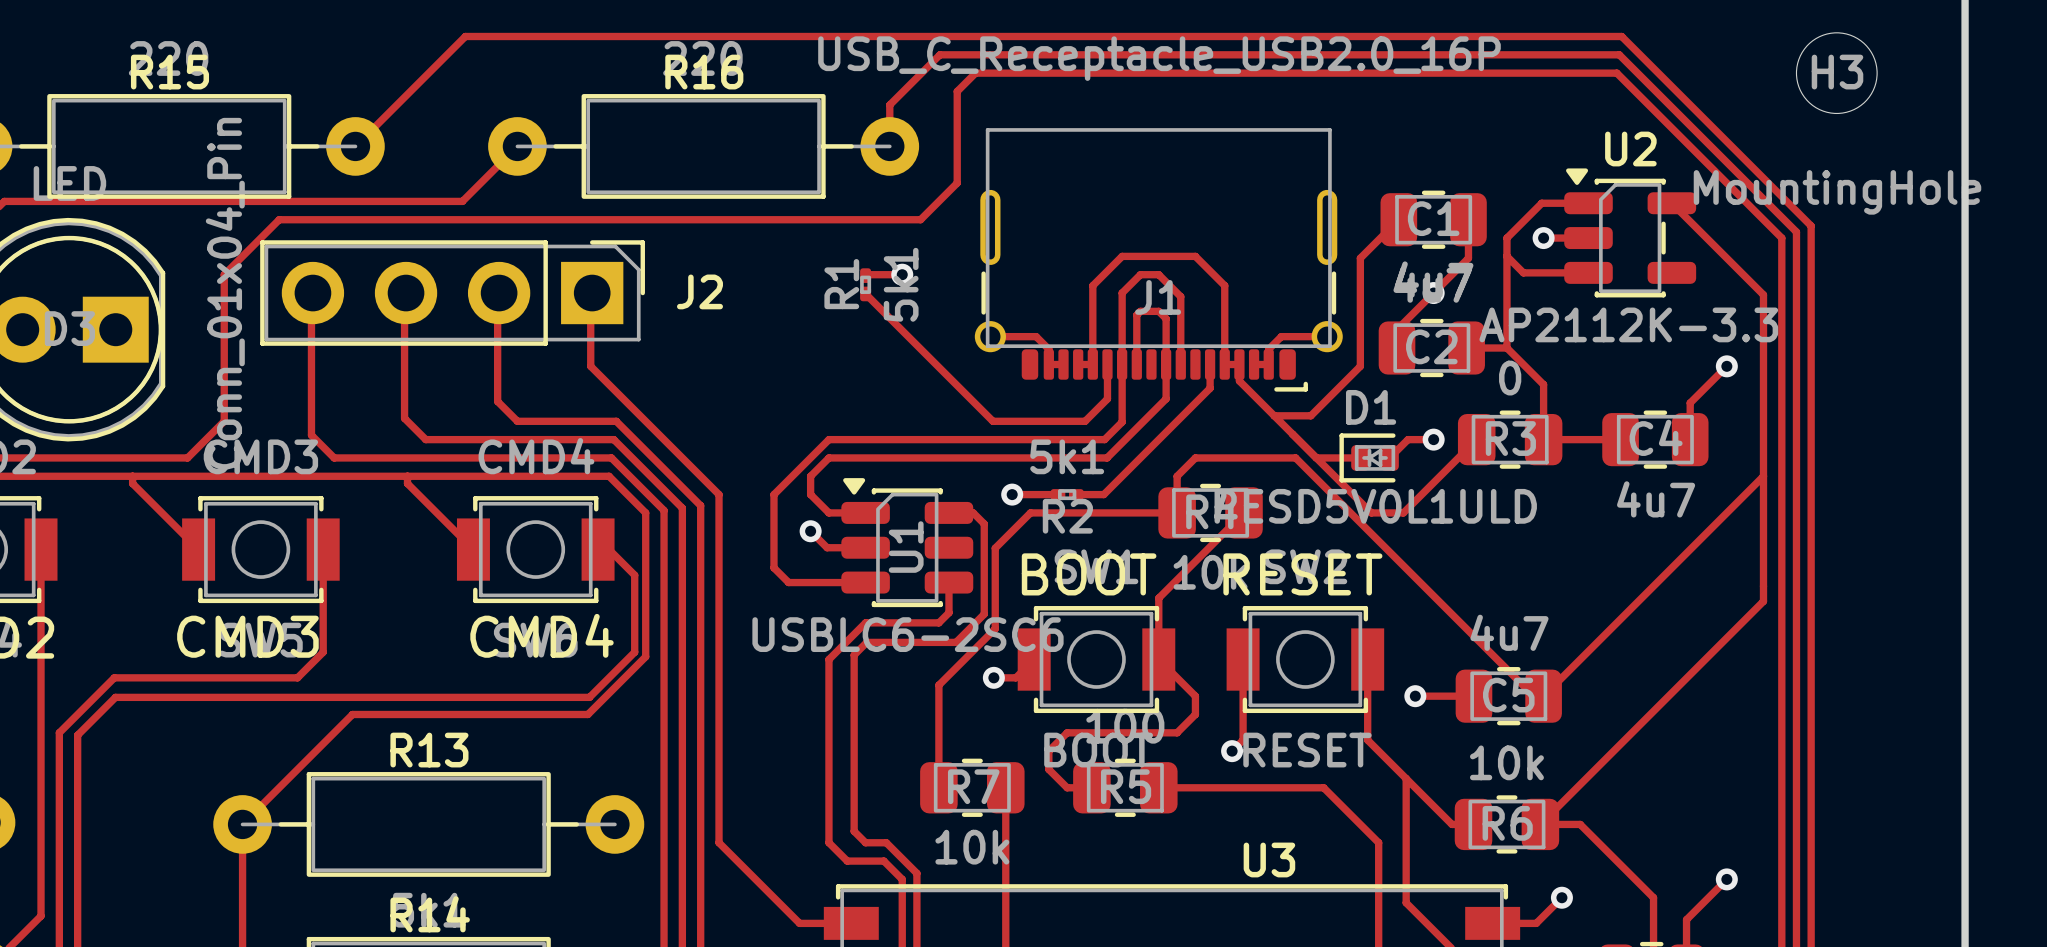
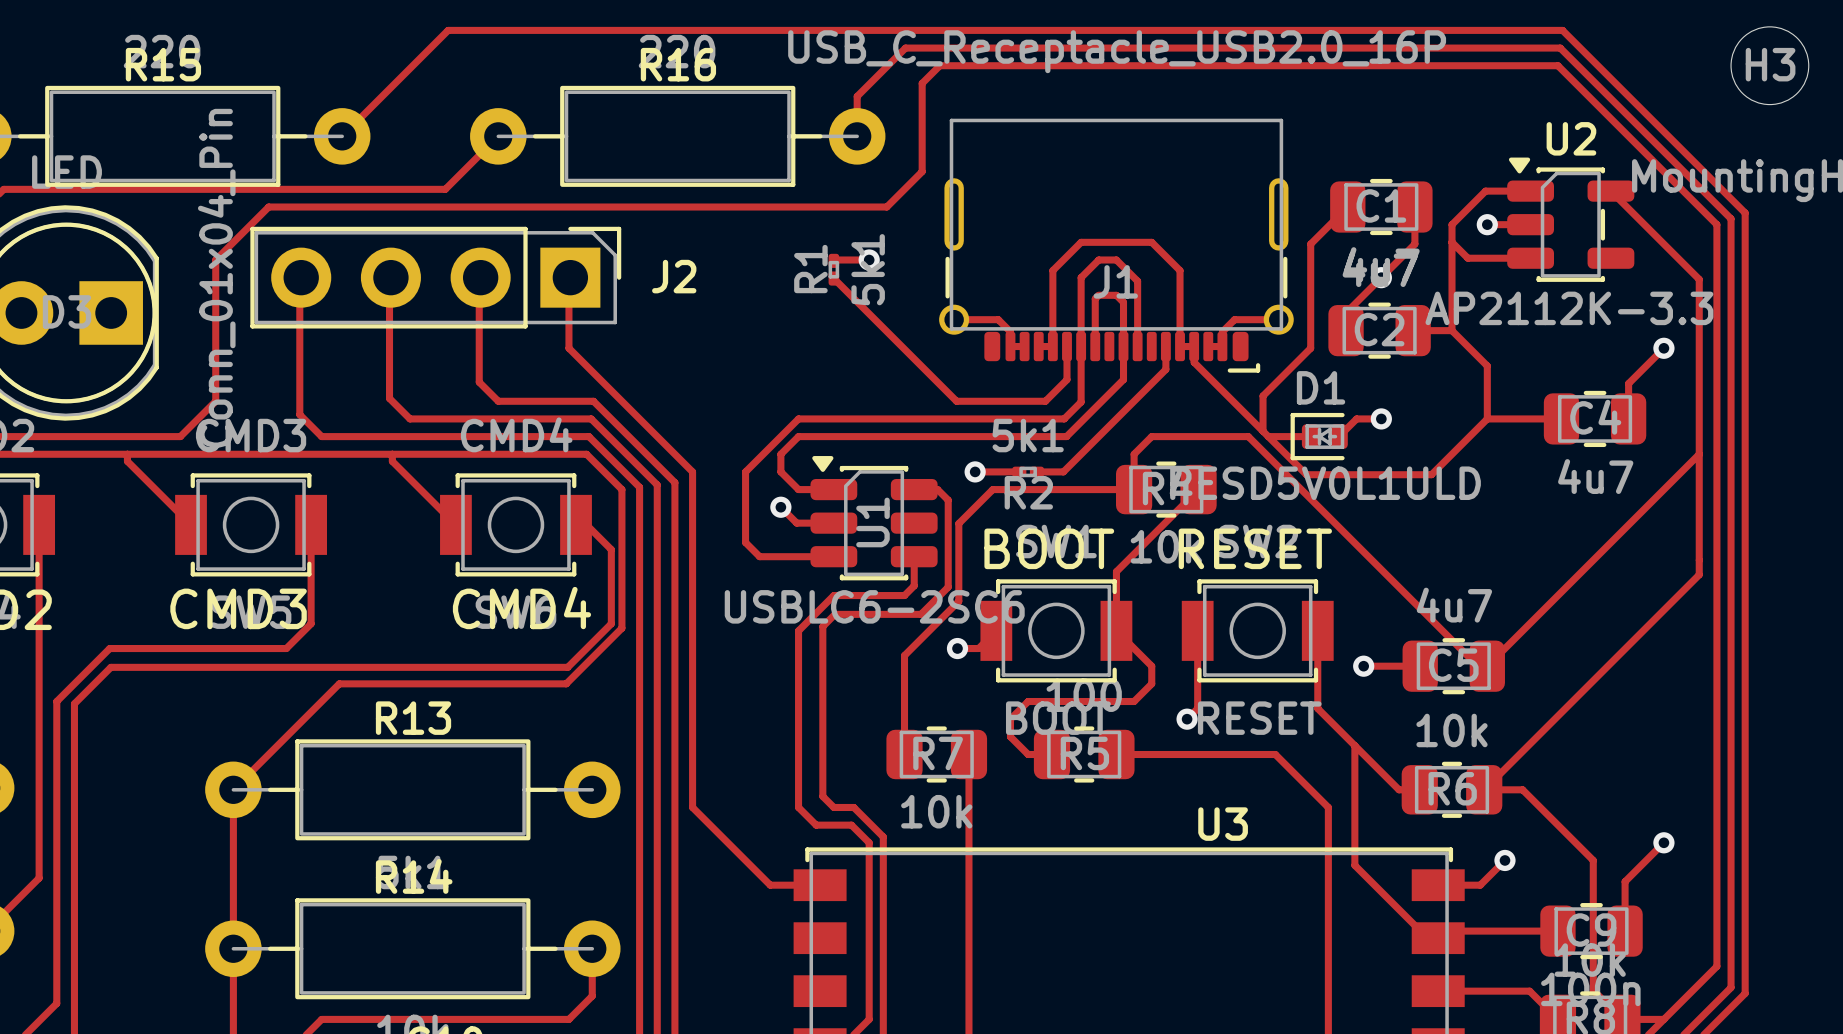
track: (1274, 415) (1310, 415) -> (1263, 431) (1263, 395)
track: (1476, 439) (1403, 512) (1371, 512) (1355, 497) -> (1485, 420) (1431, 474) (1306, 474)
R3: 0 (1510, 439) -> none

